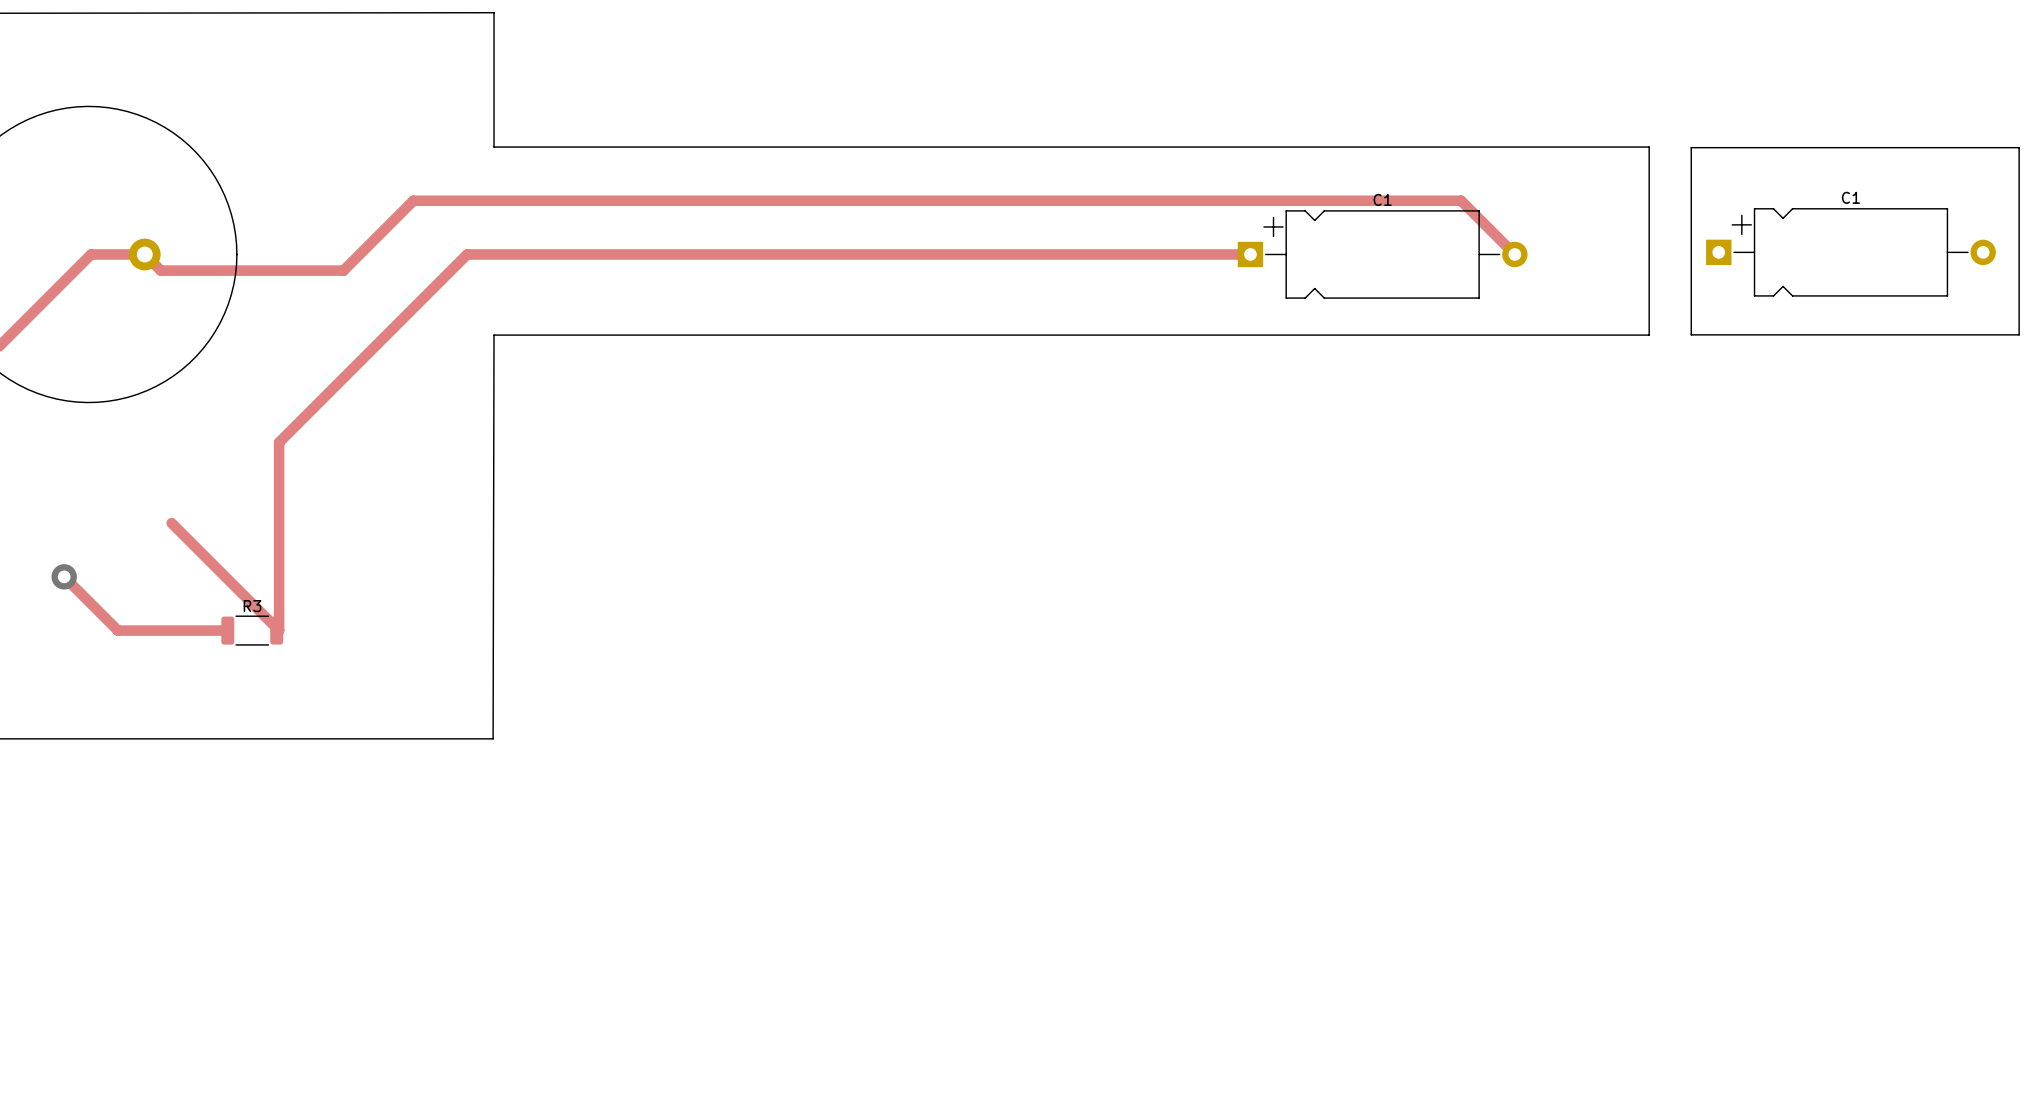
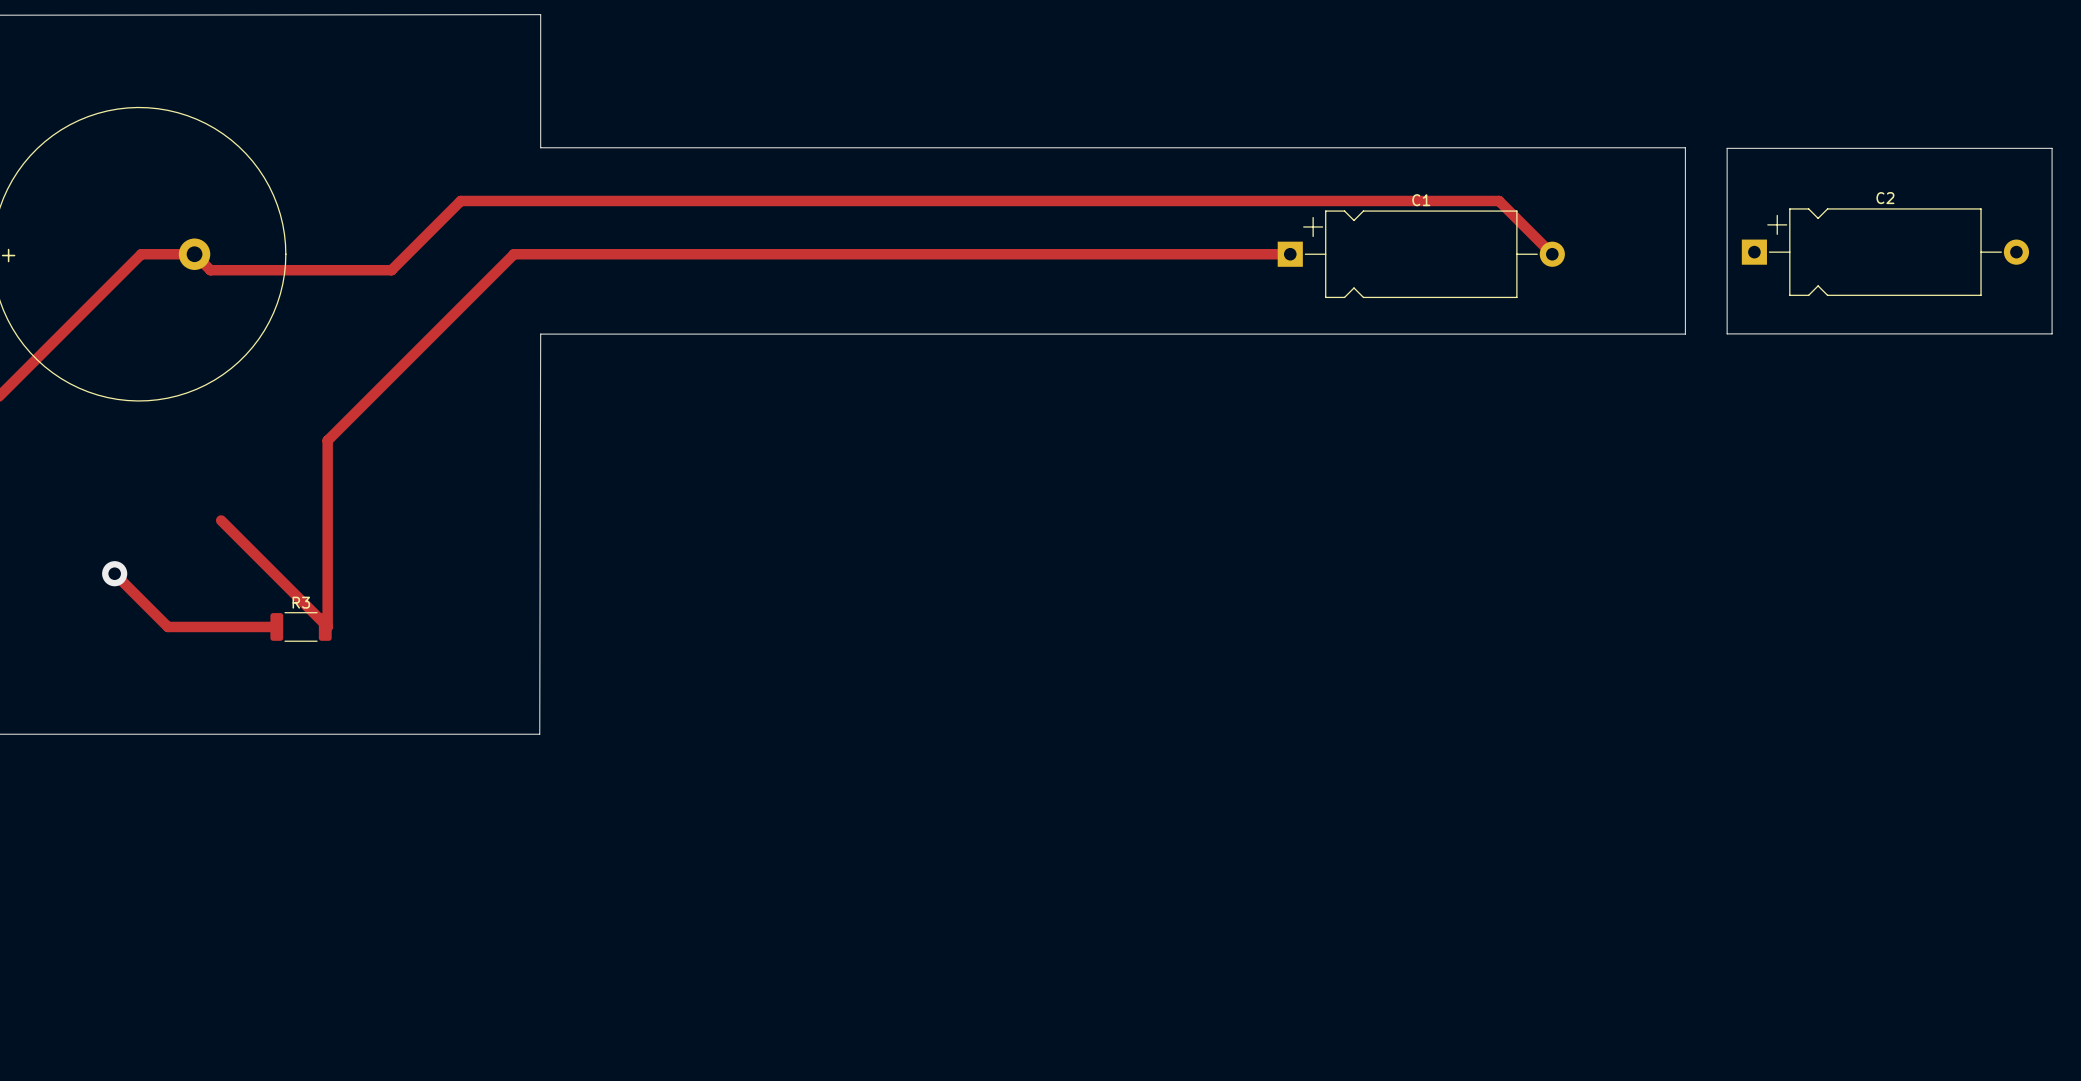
C1 name: C1 (1850, 197) -> C2 (1885, 198)

